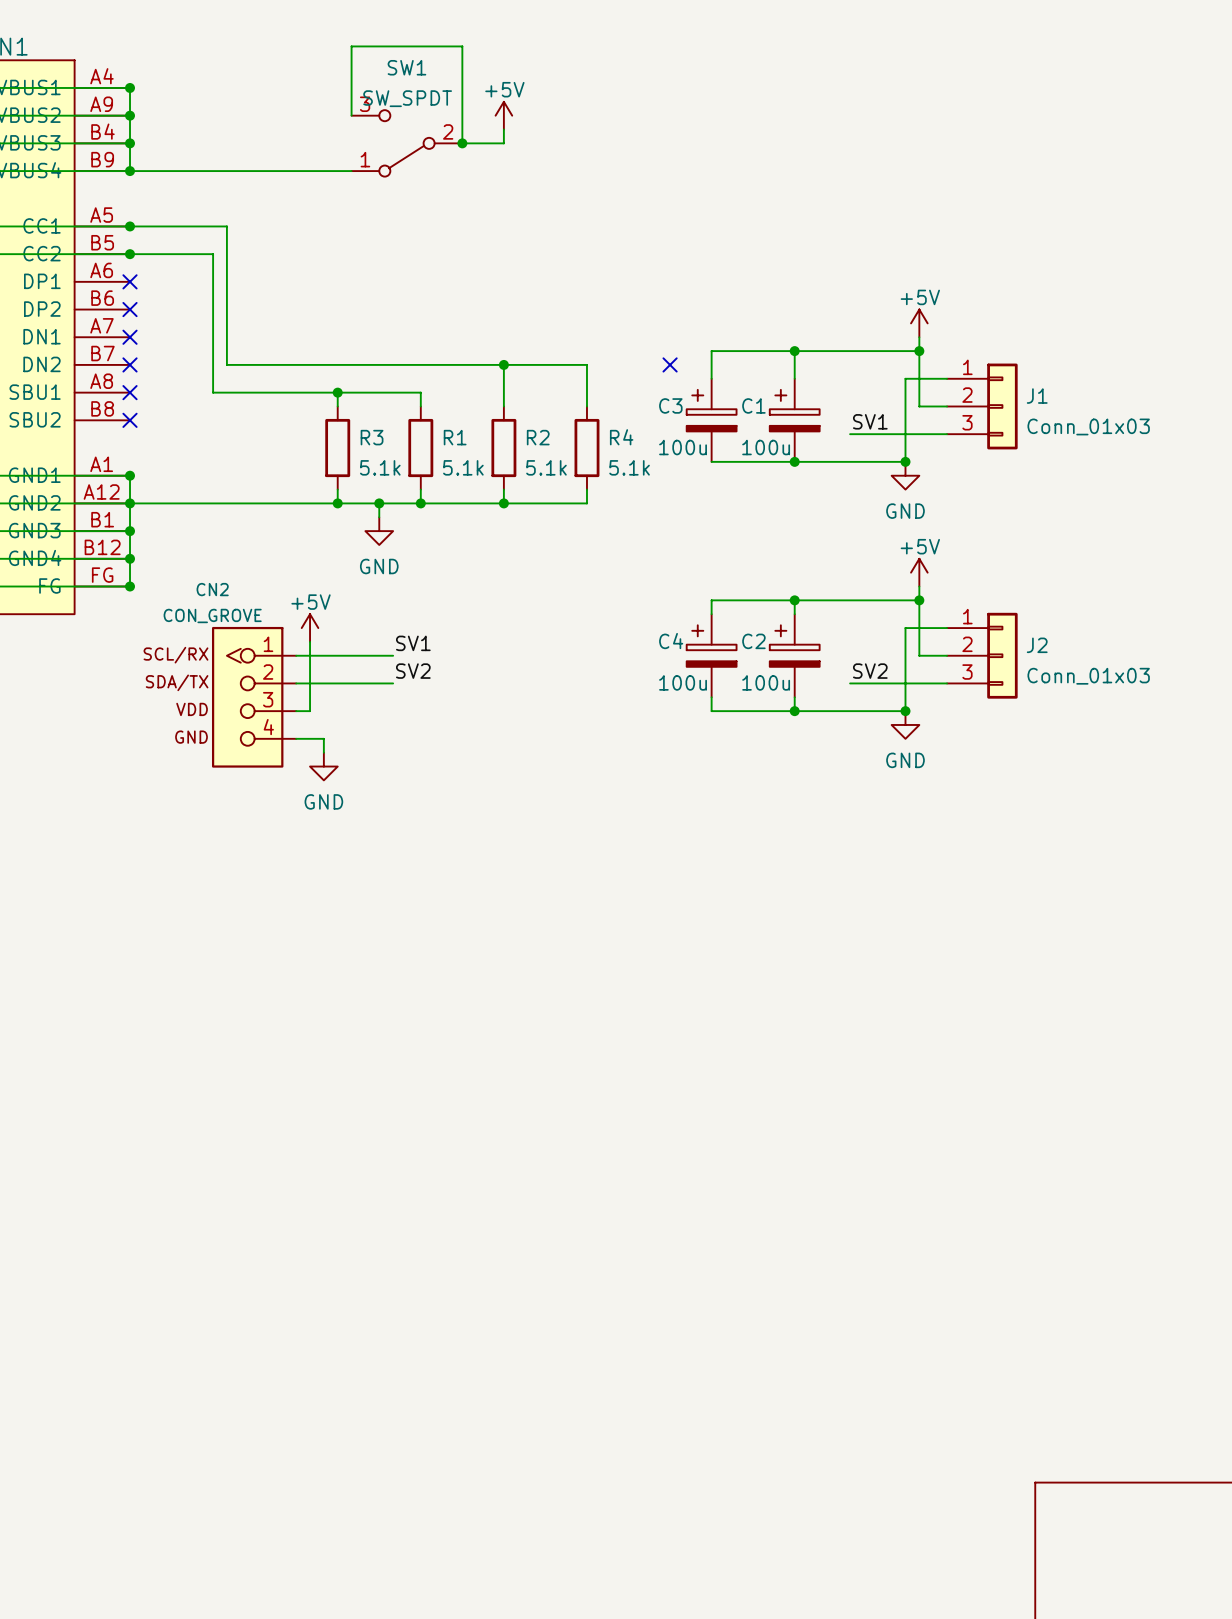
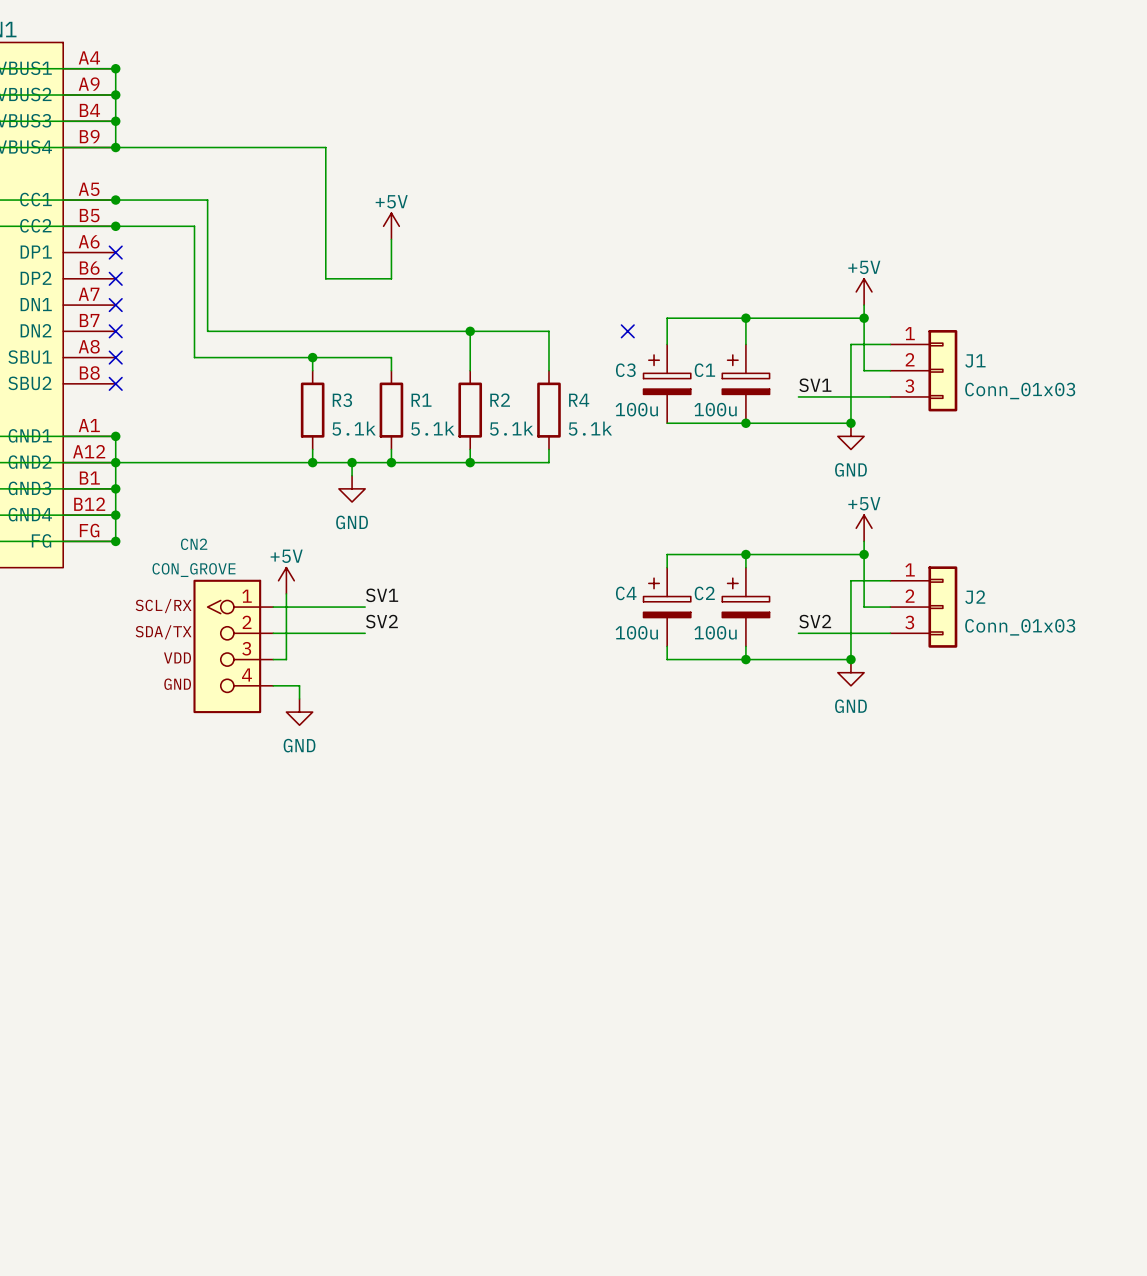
wire: (351, 115) (351, 46) (462, 46) (462, 143) (503, 143) (503, 129) -> none
power symbol position: +5V (503, 115) -> +5V (391, 226)
SW1: SW_SPDT (406, 143) -> none
junction: (462, 143) -> none
wire: none -> (325, 147) (325, 278) (391, 278) (391, 239)

